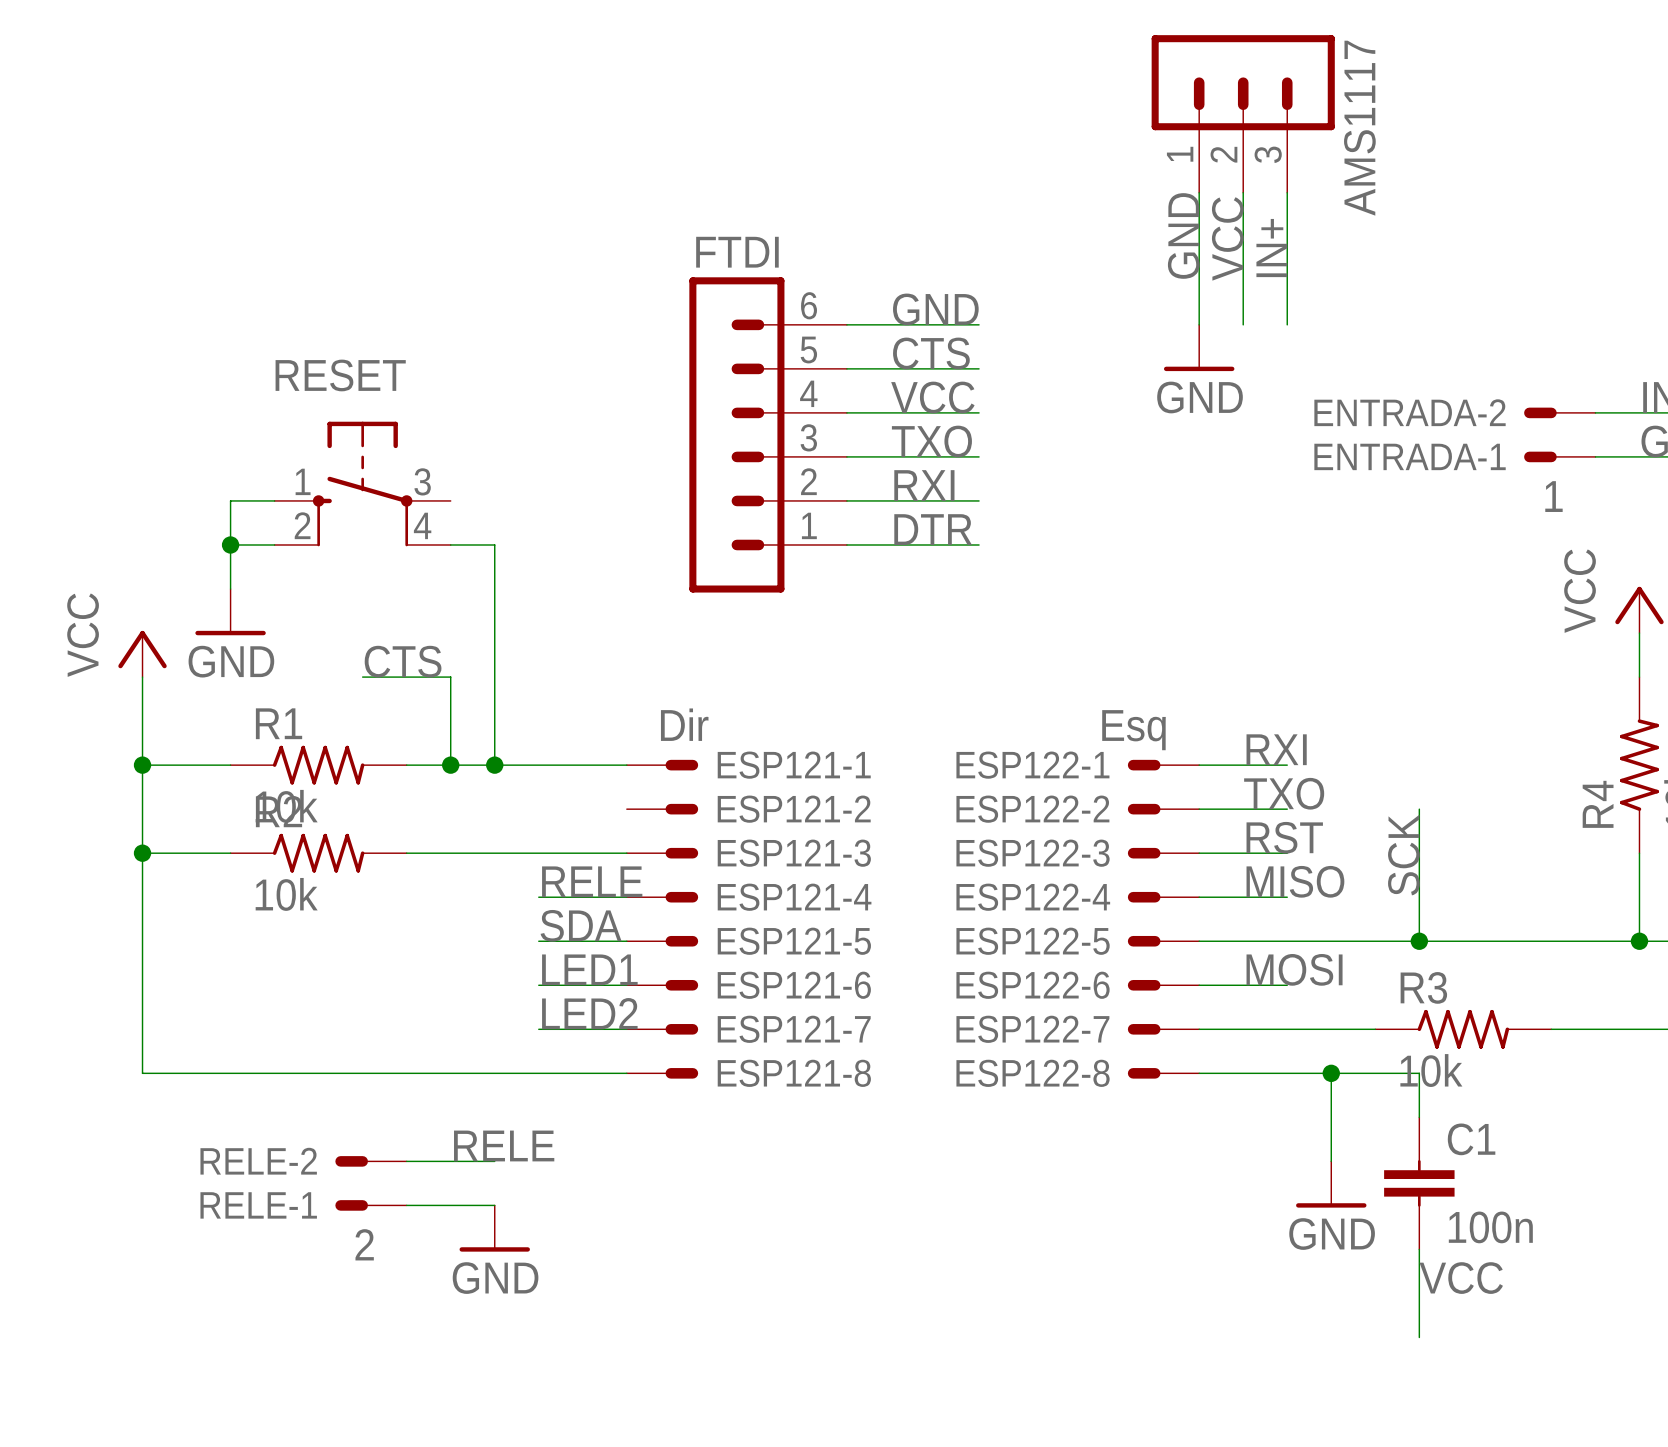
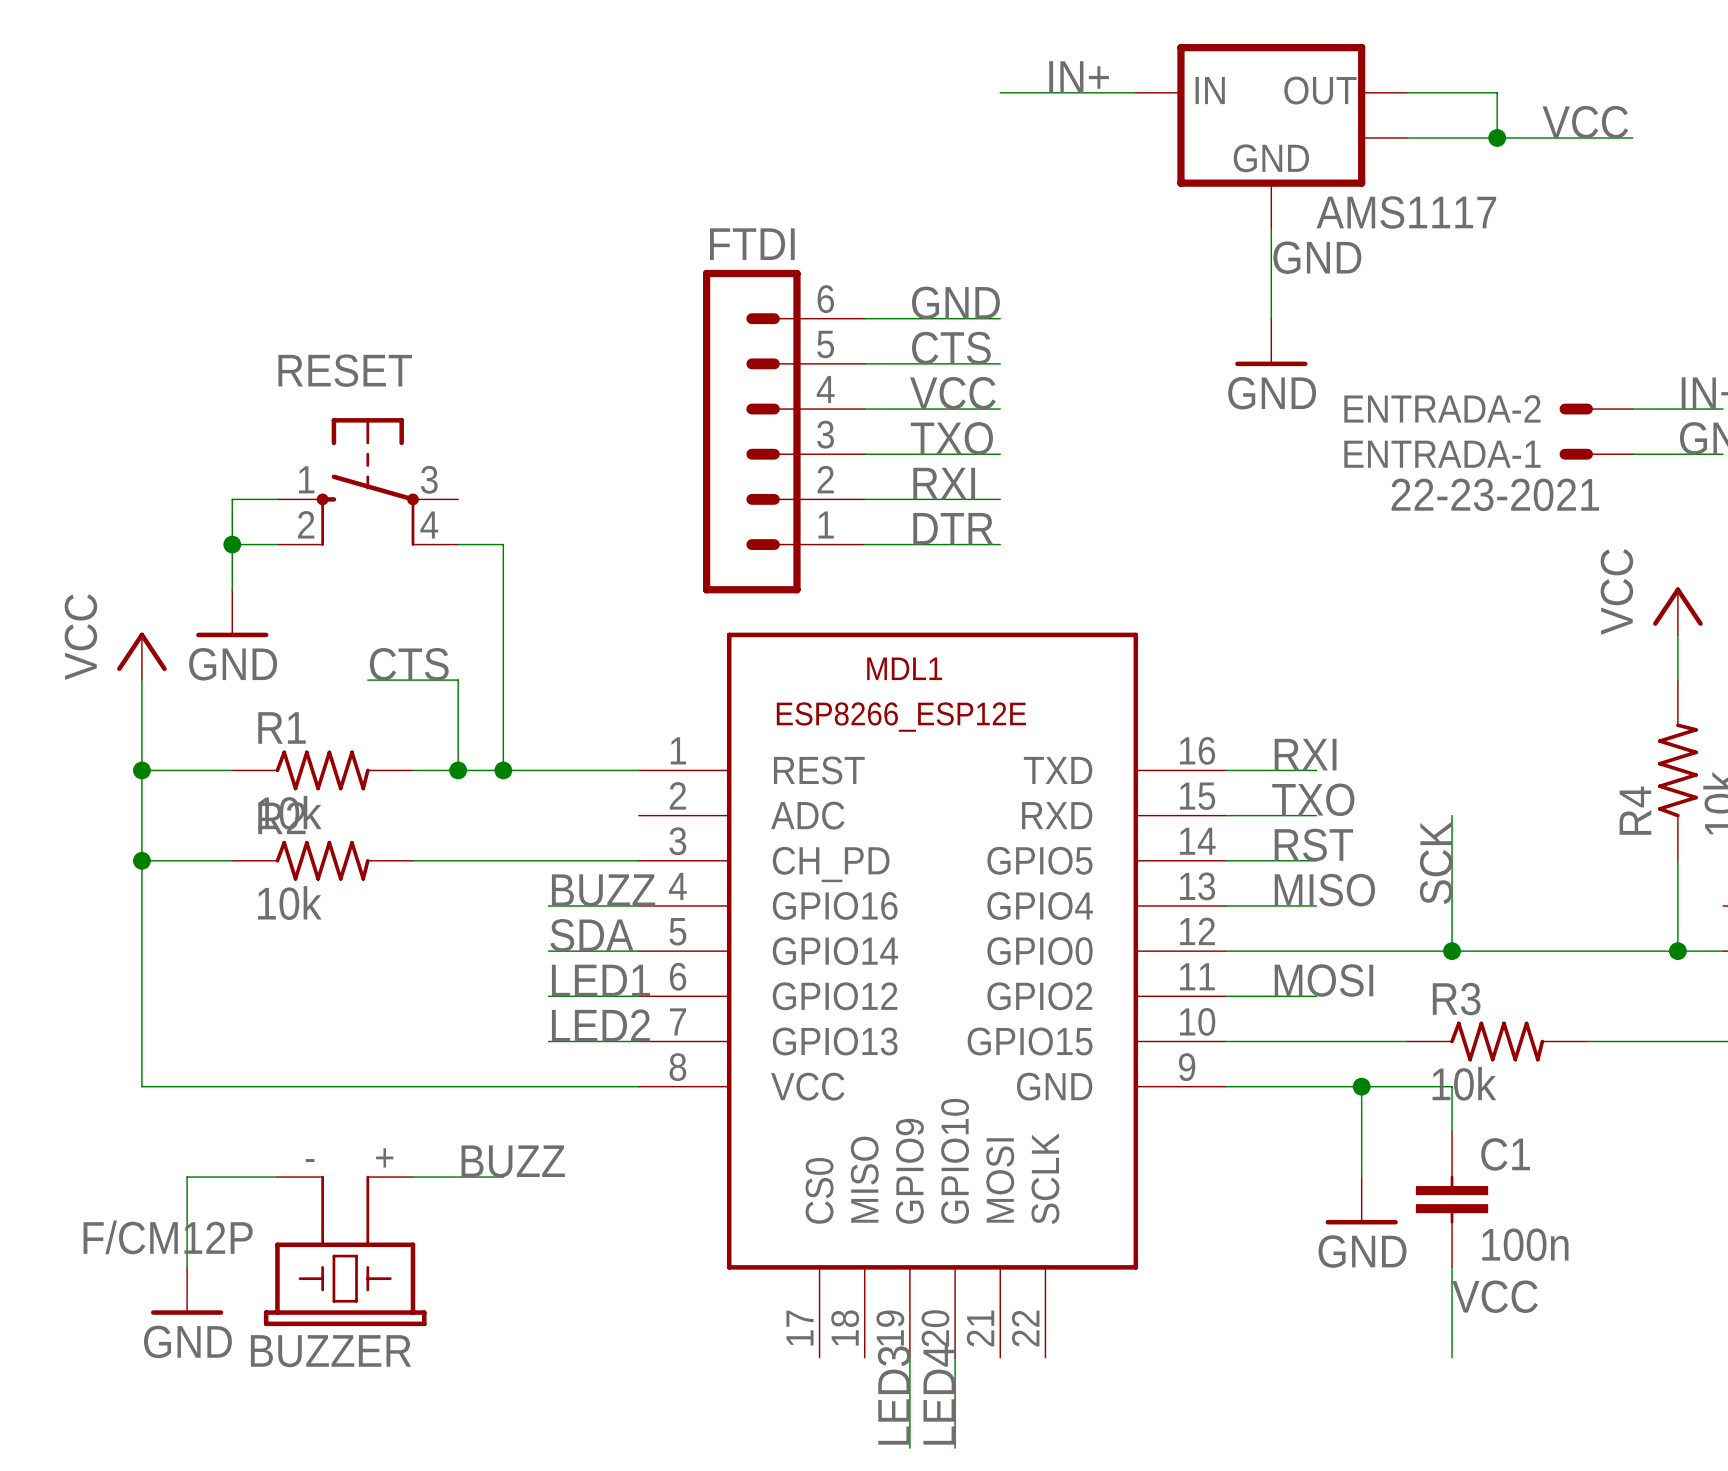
AMS1117 symbol: [1151, 35, 1335, 193] -> [1135, 44, 1407, 229]
wire: none -> (1000, 92) (1135, 92)
wire: none -> (1406, 92) (1497, 92) (1497, 137)
AMS1117 name position: AMS1117 (1359, 128) -> AMS1117 (1406, 212)
wire: none -> (1406, 137) (1632, 137)
junction: none -> (1497, 137)
wire: (1199, 192) (1199, 324) -> none
wire: (1287, 192) (1287, 324) -> none
label rotation: 0° (1183, 235) -> 90° clockwise (1317, 257)
label position: GND (1183, 235) -> GND (1317, 257)
label rotation: 0° (1227, 238) -> 90° clockwise (1585, 122)
label position: VCC (1227, 238) -> VCC (1585, 122)
label rotation: 0° (1271, 248) -> 90° clockwise (1079, 77)
label position: IN+ (1271, 248) -> IN+ (1079, 77)
power symbol position: GND (1199, 347) -> GND (1271, 342)
ENTRADA-1 value: 1 (1553, 496) -> 22-23-2021 (1495, 494)
ESP121-1: Dir (662, 765) -> none
ESP122-1: Esq (1163, 765) -> none
ESP121-2: (662, 809) -> none
ESP122-2: (1163, 809) -> none
ESP121-3: (662, 853) -> none
ESP122-3: (1163, 853) -> none
label: RELE (592, 881) -> BUZZ (603, 890)
ESP121-4: (662, 897) -> none
ESP122-4: (1163, 897) -> none
ESP121-5: (662, 941) -> none
ESP122-5: (1163, 941) -> none
MDL1: none -> (932, 995)
ESP121-6: (662, 985) -> none
ESP122-6: (1163, 985) -> none
ESP121-7: (662, 1029) -> none
ESP122-7: (1163, 1029) -> none
ESP121-8: (662, 1073) -> none
ESP122-8: (1163, 1073) -> none
label: RELE (504, 1145) -> BUZZ (513, 1161)
wire: none -> (277, 1177) (187, 1177) (187, 1267)
RELE-2: (371, 1161) -> none
RELE-1: 2 (371, 1205) -> none
wire: (406, 1205) (494, 1205) -> none
power symbol position: GND (494, 1228) -> GND (187, 1291)
BUZZER: none -> F/CM12P (345, 1250)
wire: none -> (909, 1357) (909, 1448)
wire: none -> (955, 1357) (955, 1448)
label: none -> LED3 (894, 1395)
label: none -> LED4 (939, 1395)

